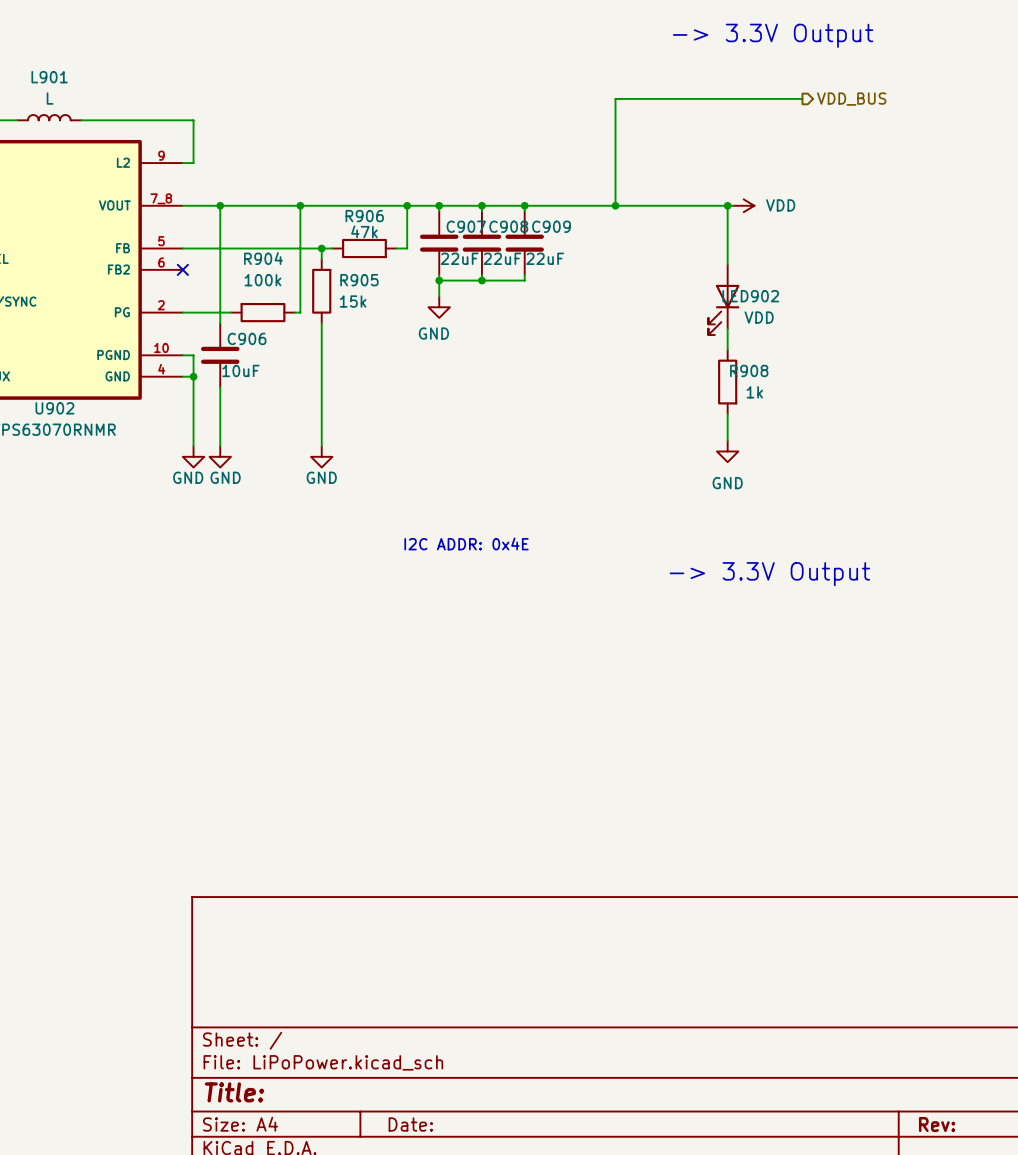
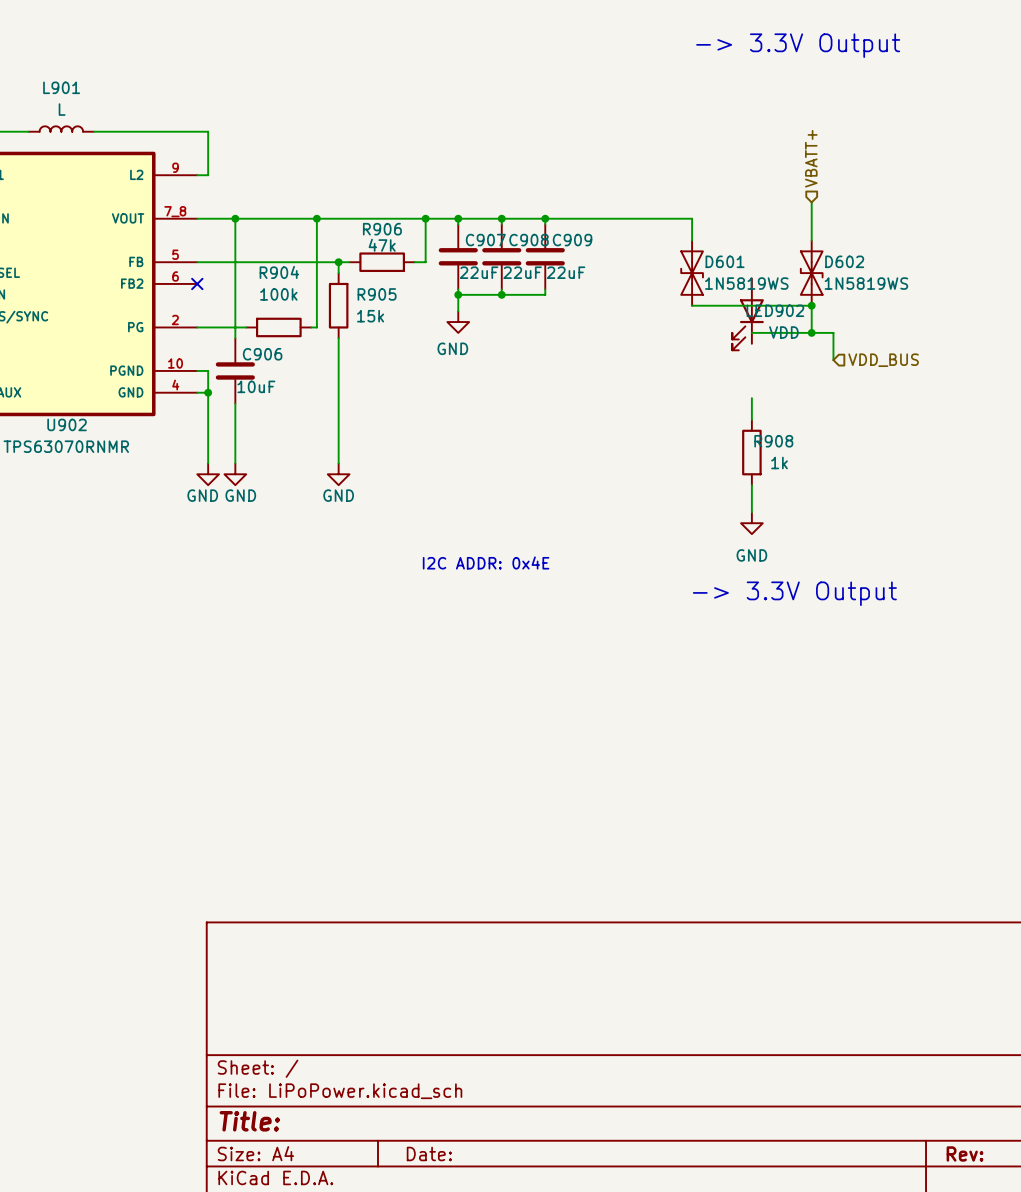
wire: (802, 98) (615, 98) (615, 205) -> none
hierarchical label: VDD_BUS (851, 99) -> none
hierarchical label: none -> VBATT+ (811, 158)
wire: none -> (811, 202) (811, 240)
junction: (615, 205) -> none
wire: (668, 205) (733, 205) -> (692, 218) (692, 240)
wire: (727, 205) (727, 264) -> none
junction: (727, 205) -> none
power symbol: VDD (743, 205) -> none
D601: none -> 1N5819WS (692, 273)
D602: none -> 1N5819WS (811, 273)
wire: none -> (692, 305) (811, 305) (811, 332)
junction: none -> (811, 305)
wire: none -> (751, 332) (833, 332) (833, 360)
junction: none -> (811, 332)
wire: (727, 328) (727, 349) -> (751, 398) (751, 419)
hierarchical label: none -> VDD_BUS (883, 360)
R908 position: (727, 382) -> (751, 452)
wire: (727, 414) (727, 440) -> (751, 485) (751, 512)
power symbol position: GND (727, 451) -> GND (751, 523)

